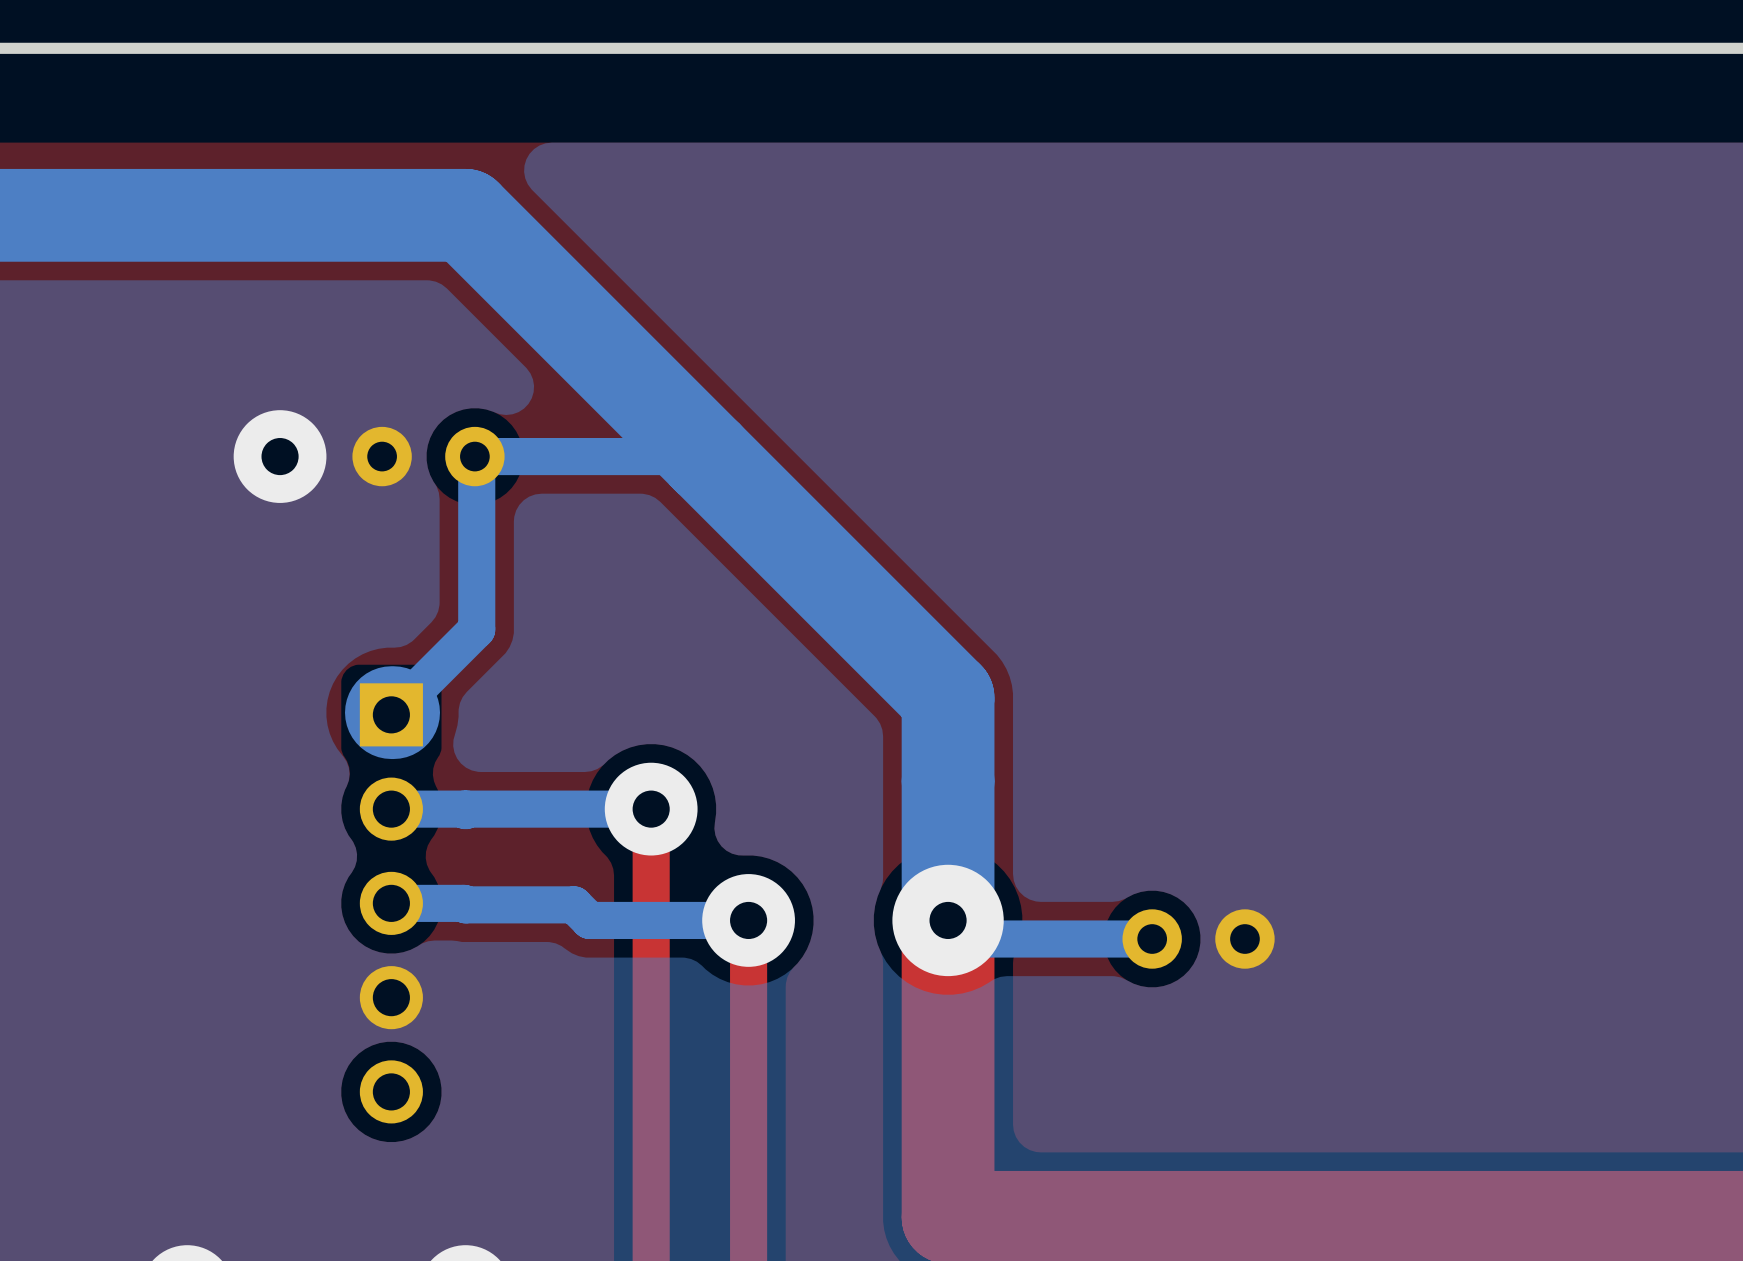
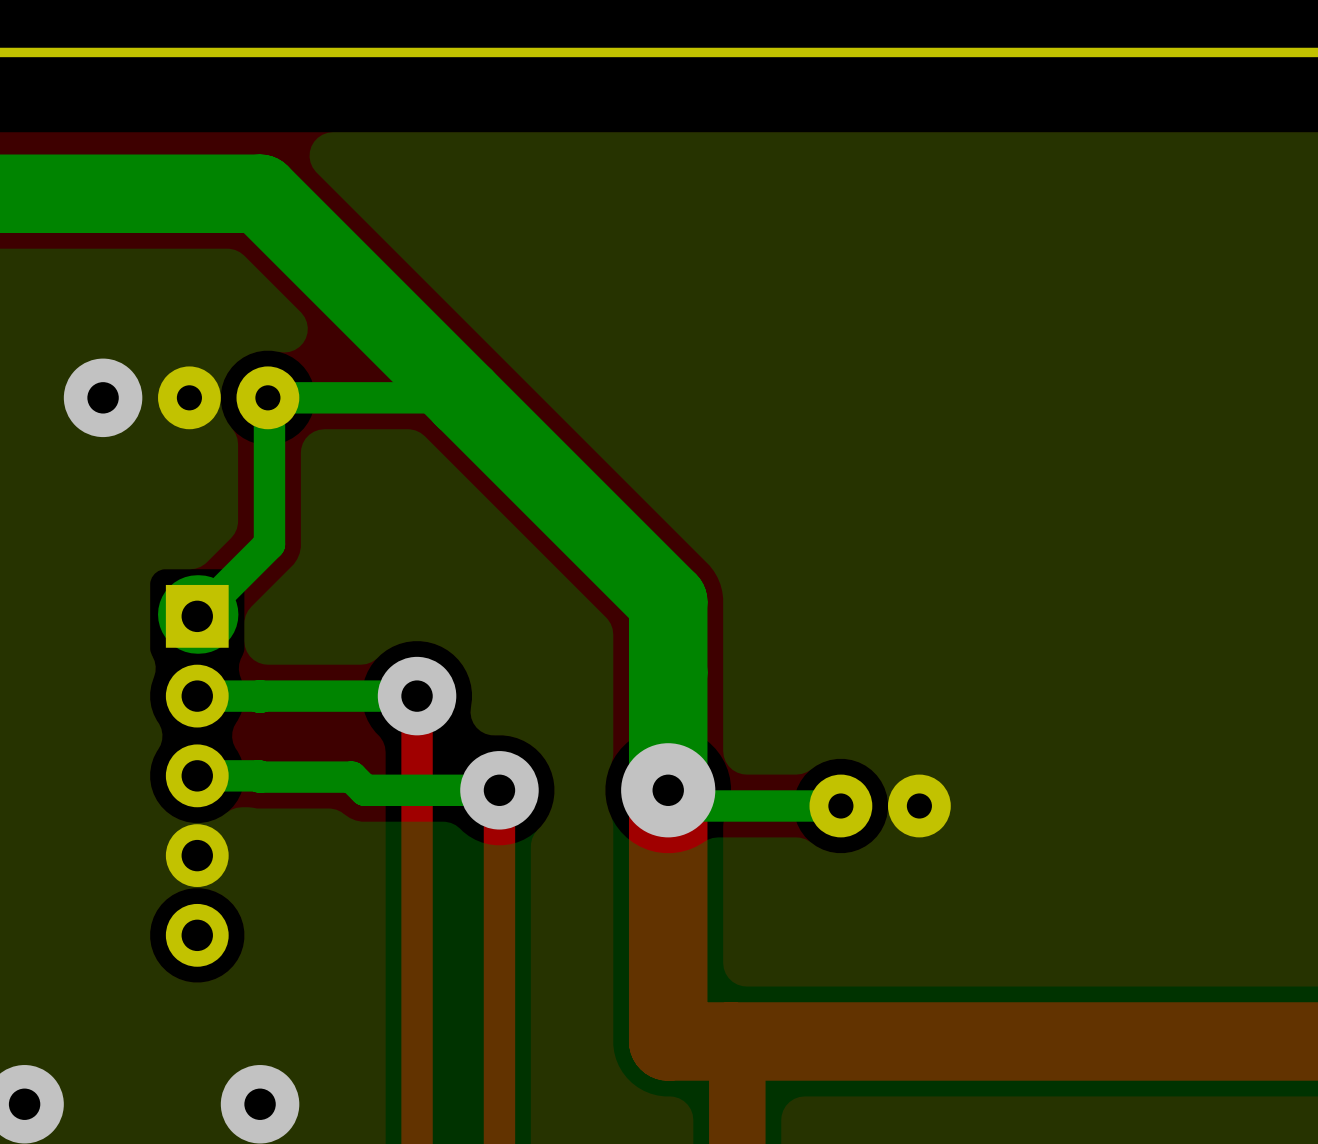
part footprint: [352, 426, 505, 487] -> [158, 366, 300, 430]
part footprint: [359, 683, 423, 1124] -> [165, 584, 229, 967]
part footprint: [1122, 909, 1275, 969] -> [809, 774, 951, 838]

